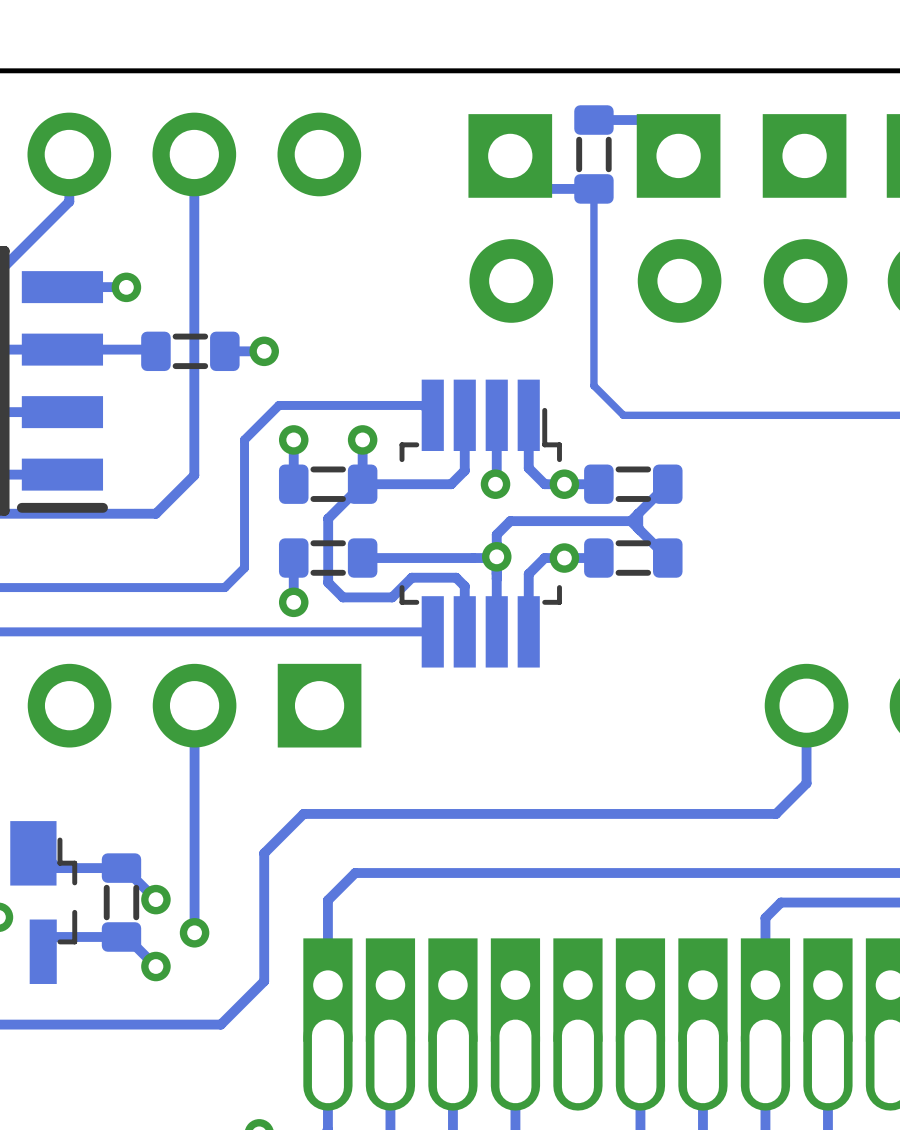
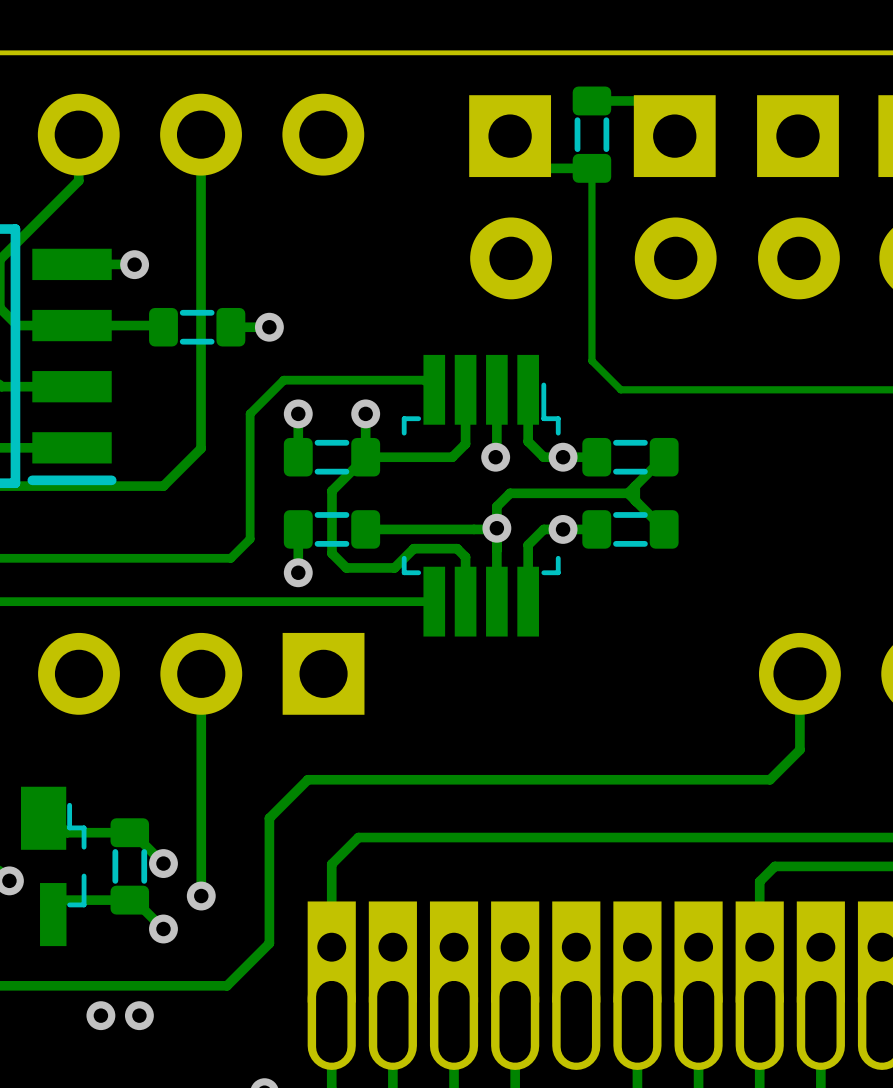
via: none -> (100, 1015)
via: none -> (139, 1015)

